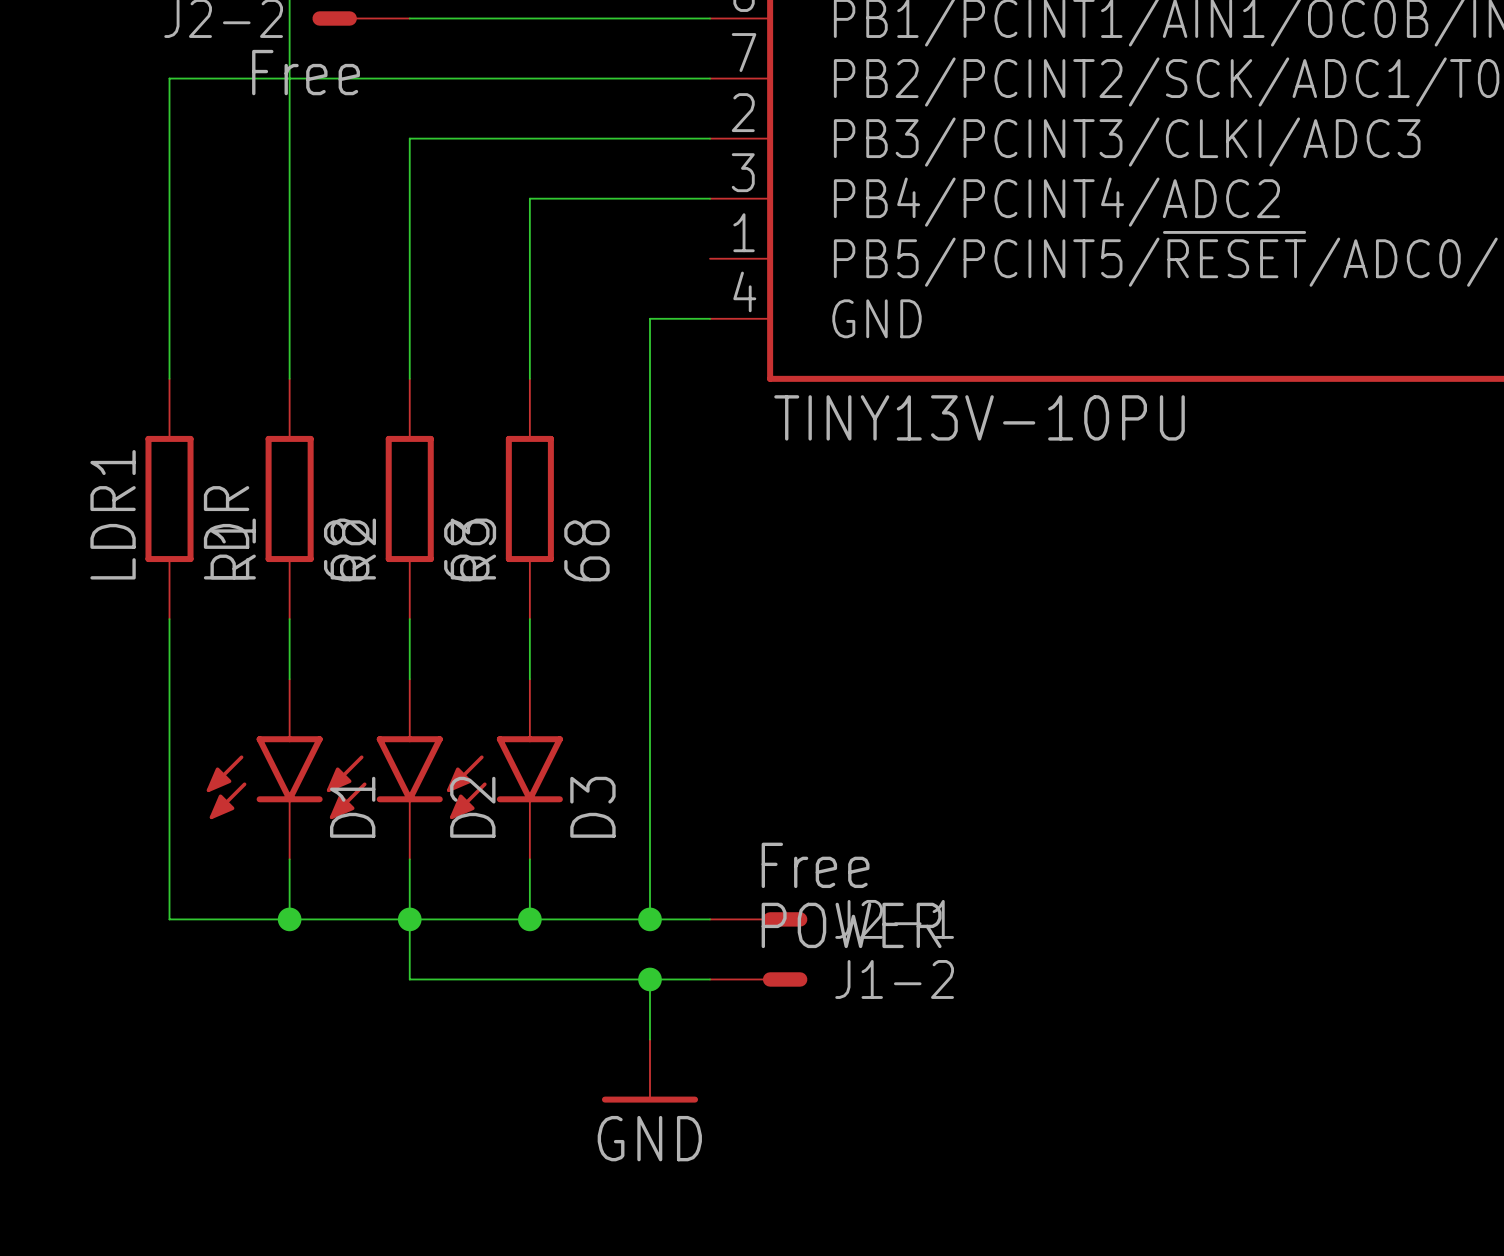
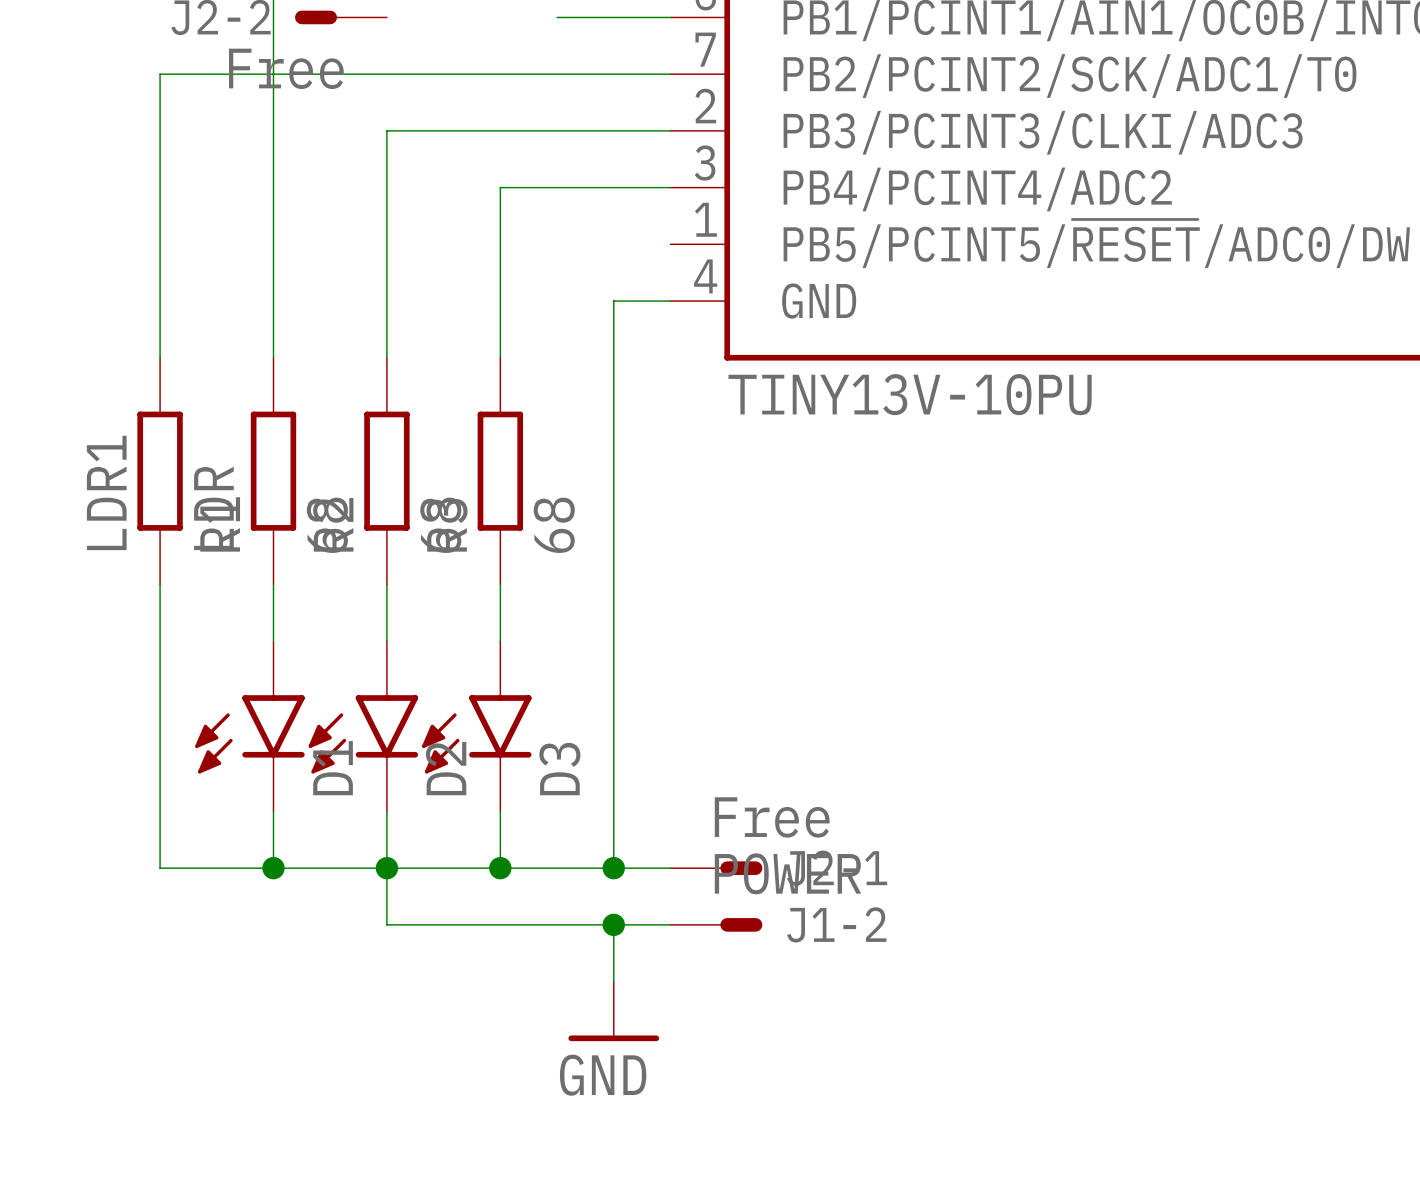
wire: (409, 18) (589, 18) -> none

